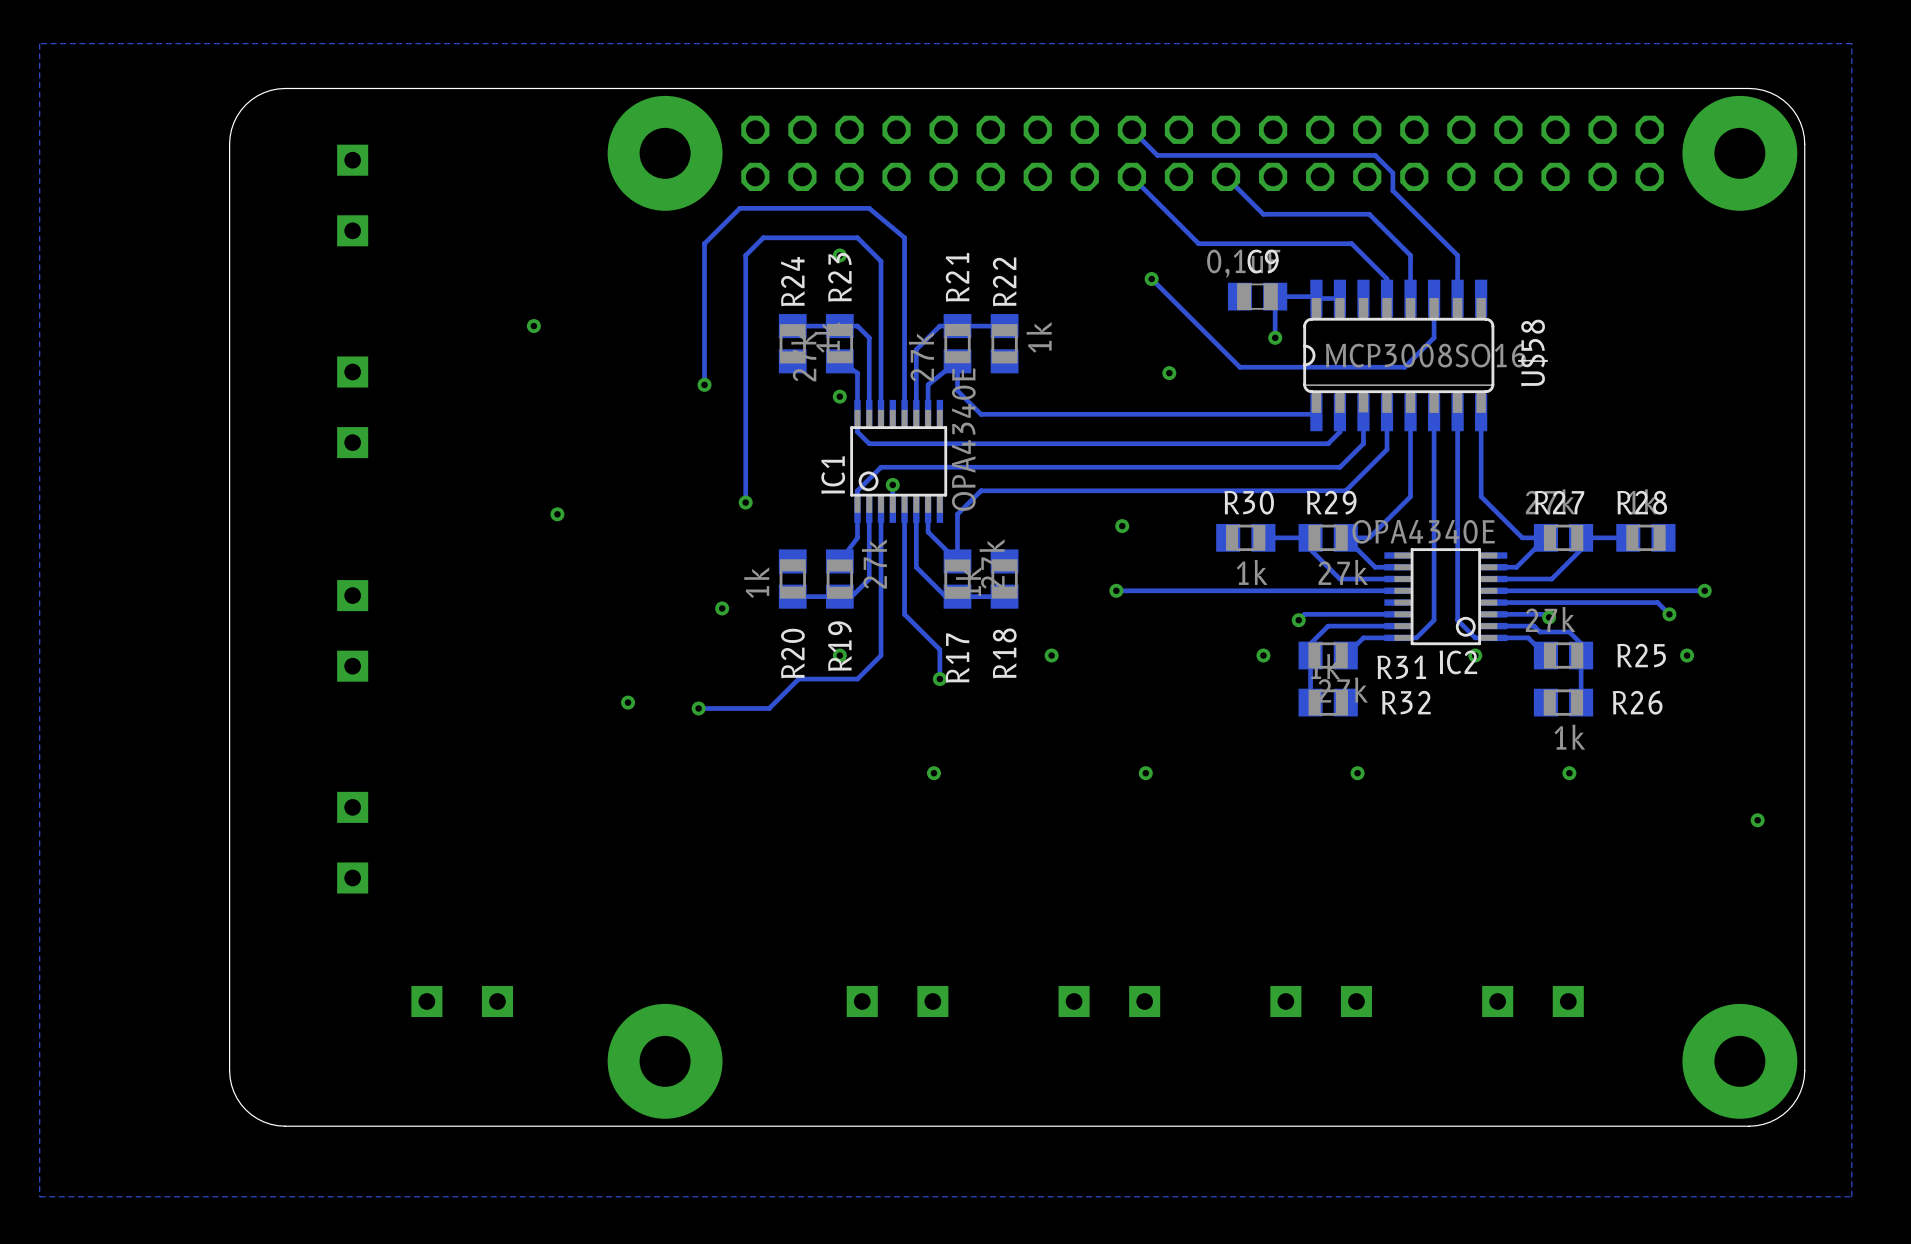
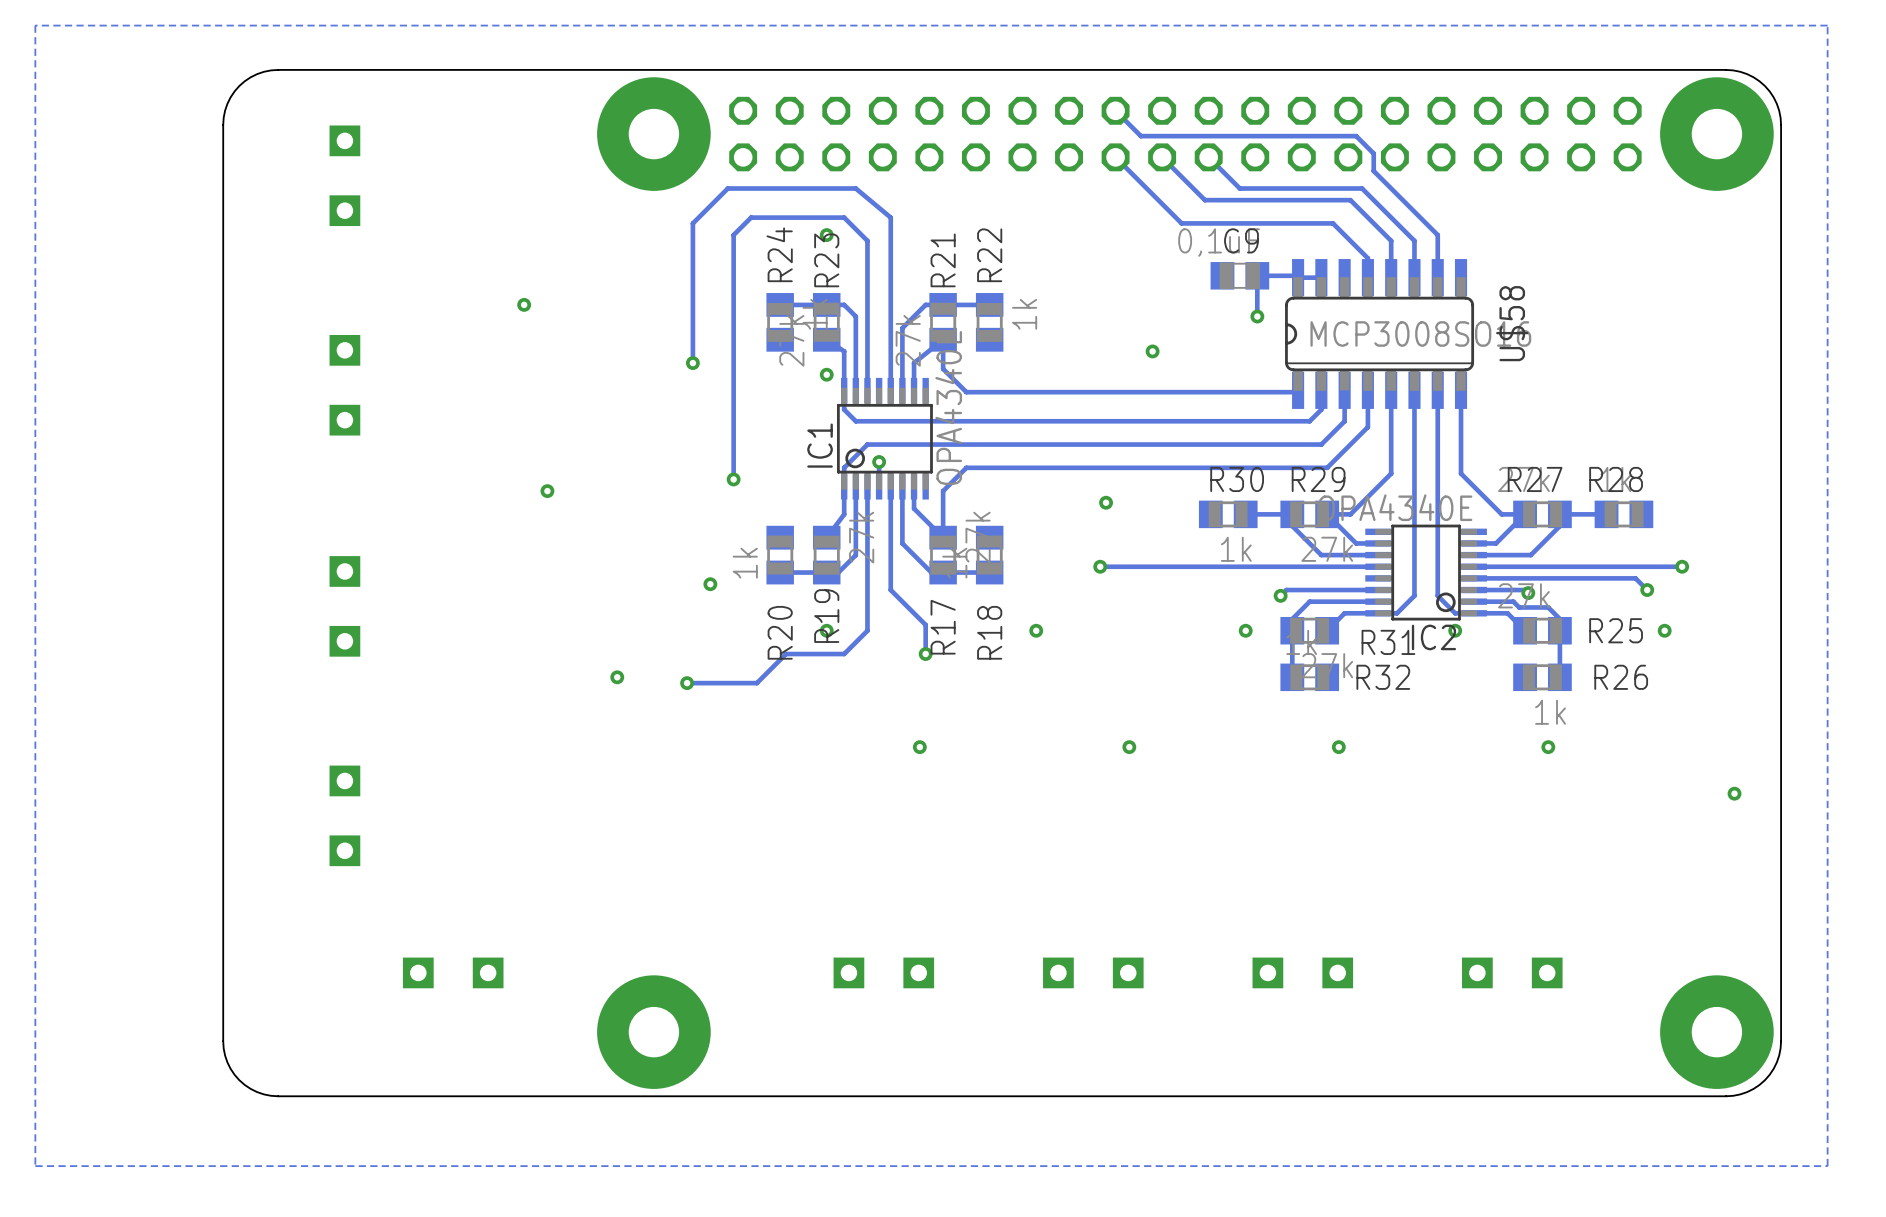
track: none -> (1162, 157) (1204, 200) (1350, 200) (1391, 240)
track: (1257, 208) (1263, 214) (1369, 214) (1410, 255) (1410, 261) -> (1239, 188) (1362, 188) (1414, 240) (1414, 277)
track: (1151, 278) (1239, 367) (1404, 367) (1434, 337) (1434, 298) -> none
via: (1151, 278) -> none

